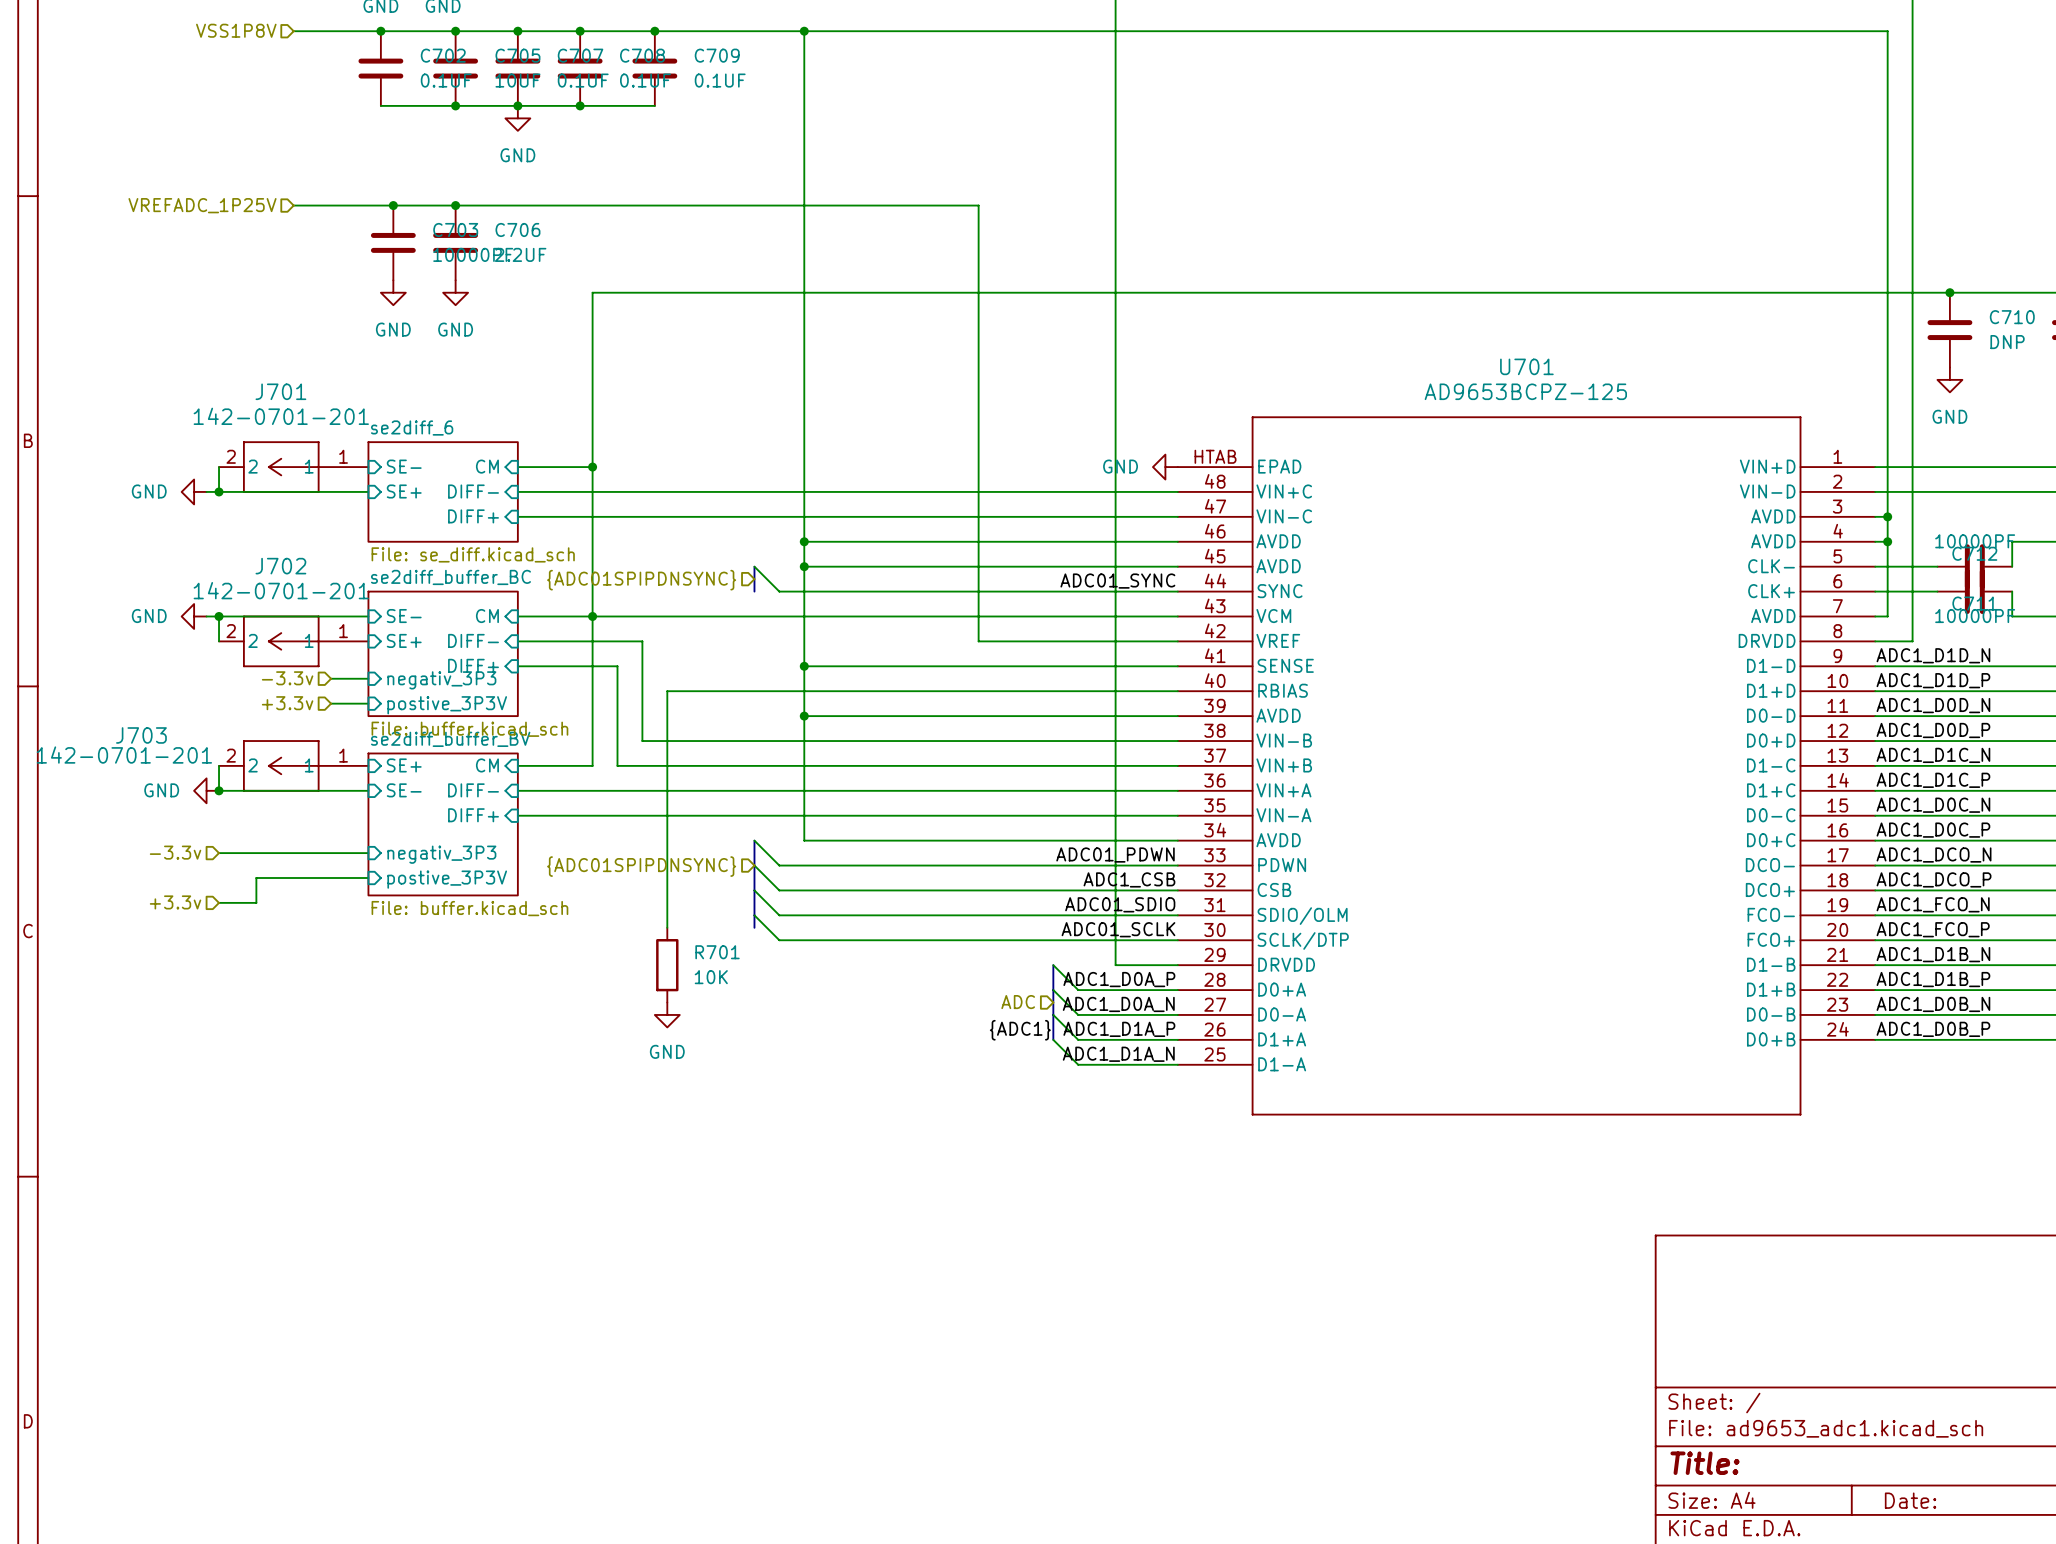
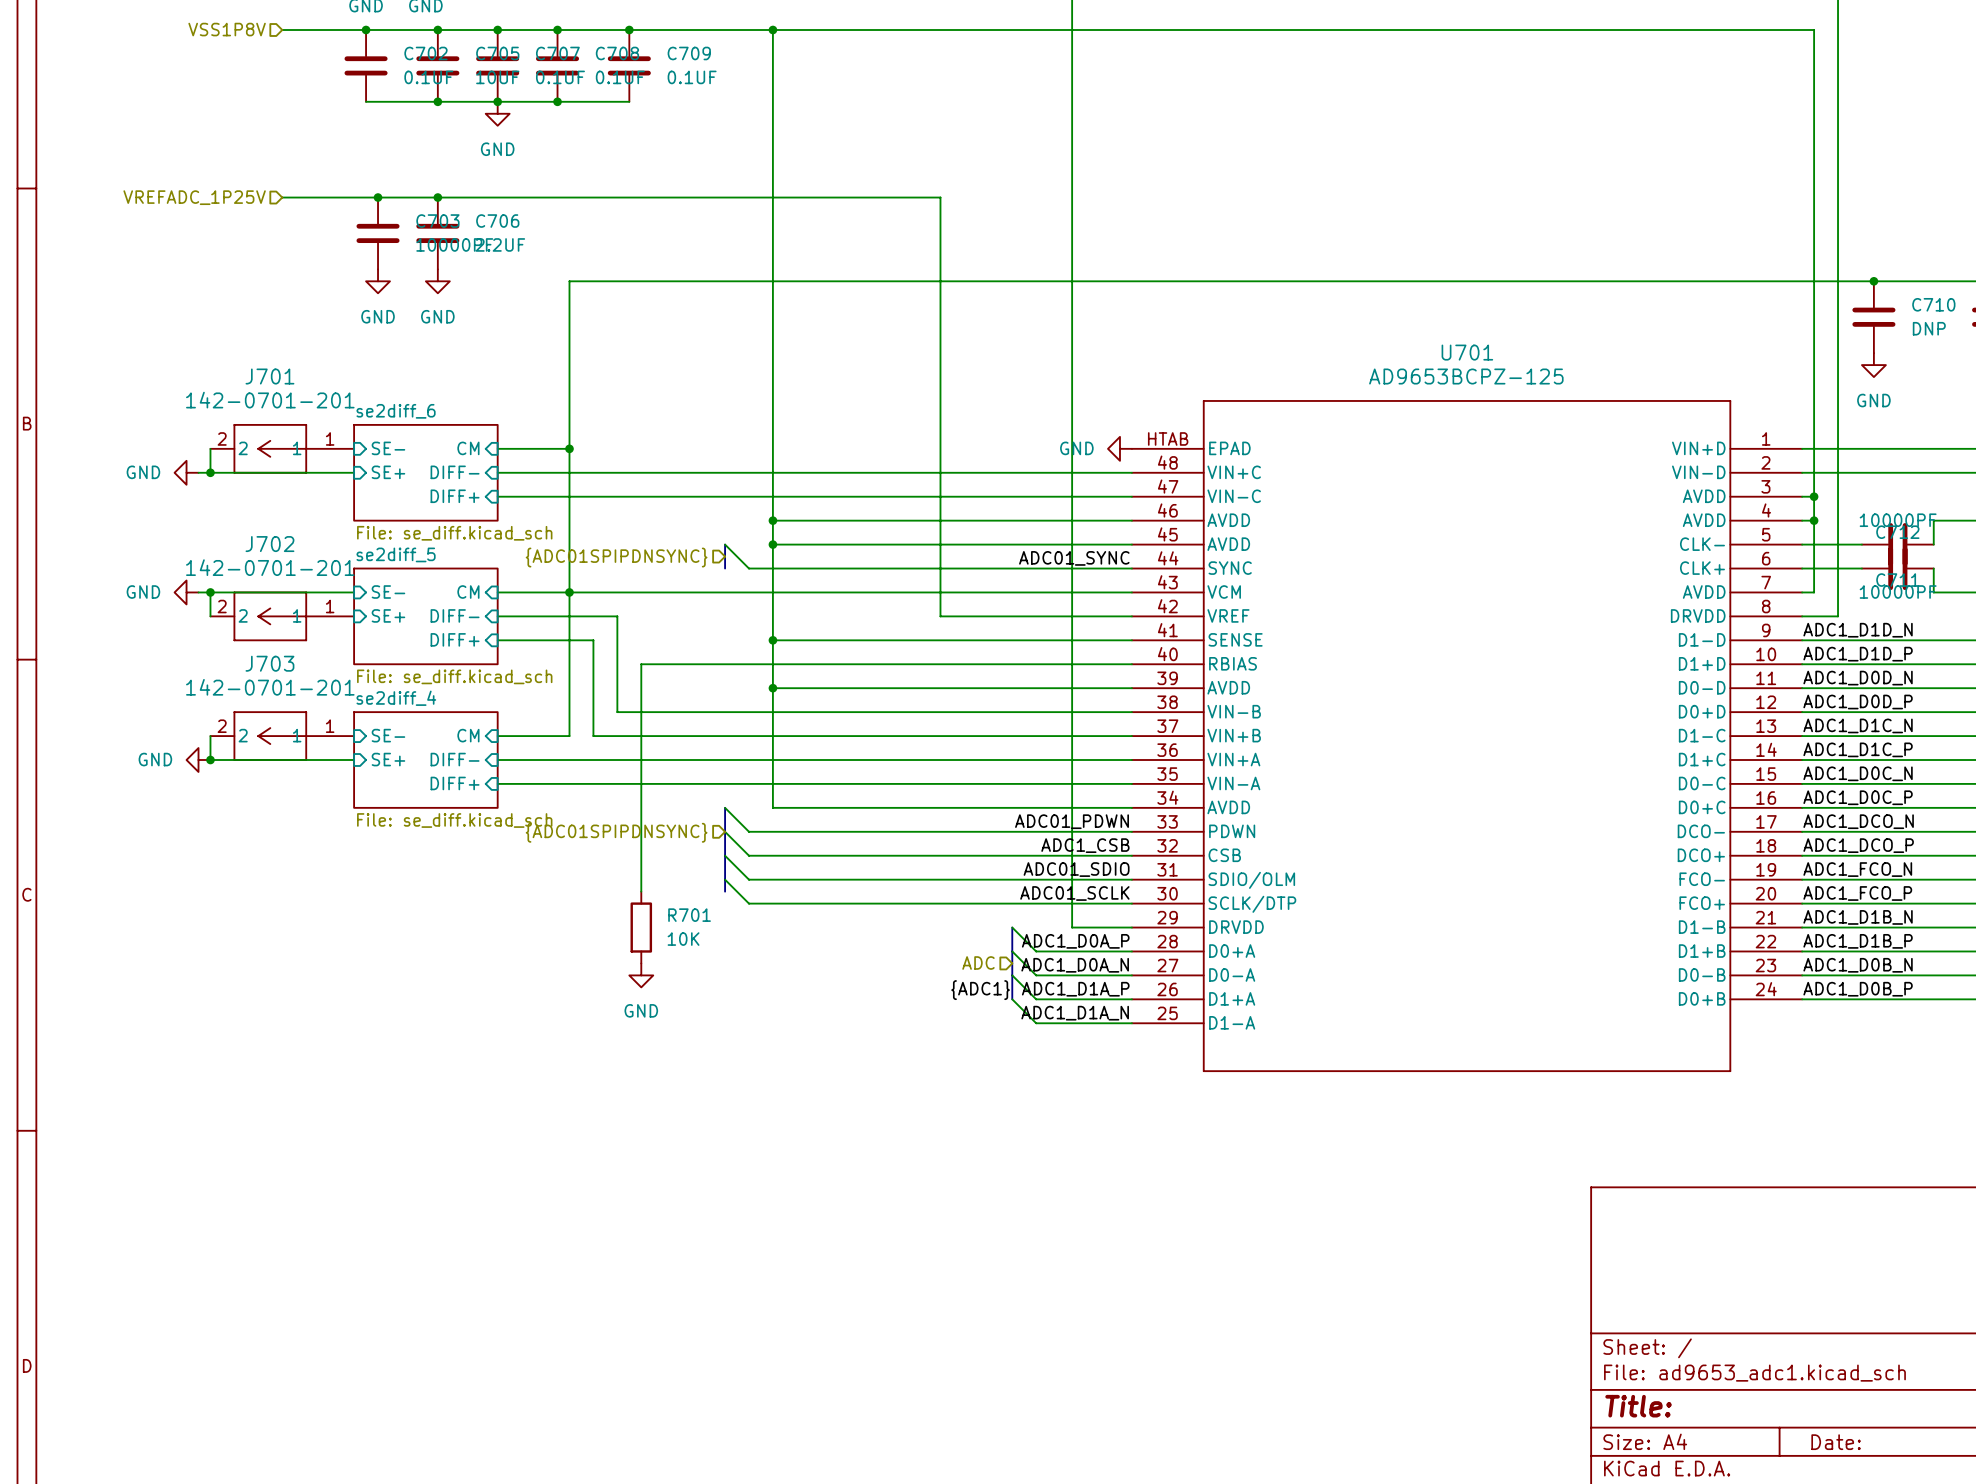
sheet se2diff_5: none -> File: se_diff.kicad_sch (425, 616)
sheet se2diff_buffer_BC: File: buffer.kicad_sch (443, 653) -> none
hierarchical label: -3.3v (287, 678) -> none
wire: (331, 678) (368, 678) -> none
sheet pin: negativ_3P3 (441, 680) -> none
hierarchical label: +3.3v (287, 703) -> none
wire: (331, 703) (368, 703) -> none
sheet pin: postive_3P3V (447, 705) -> none
J703 name position: J703 (141, 735) -> J703 (269, 663)
J703 value position: 142-0701-201 (124, 755) -> 142-0701-201 (270, 687)
sheet pin: SE+ (404, 765) -> SE- (388, 735)
sheet pin: SE- (404, 790) -> SE+ (388, 759)
sheet se2diff_4: none -> File: se_diff.kicad_sch (425, 760)
sheet se2diff_buffer_BV: File: buffer.kicad_sch (443, 824) -> none
hierarchical label: -3.3v (175, 852) -> none
wire: (219, 853) (368, 853) -> none
sheet pin: negativ_3P3 (441, 854) -> none
wire: (368, 877) (256, 877) (256, 902) (219, 902) -> none
sheet pin: postive_3P3V (447, 879) -> none
hierarchical label: +3.3v (175, 902) -> none

